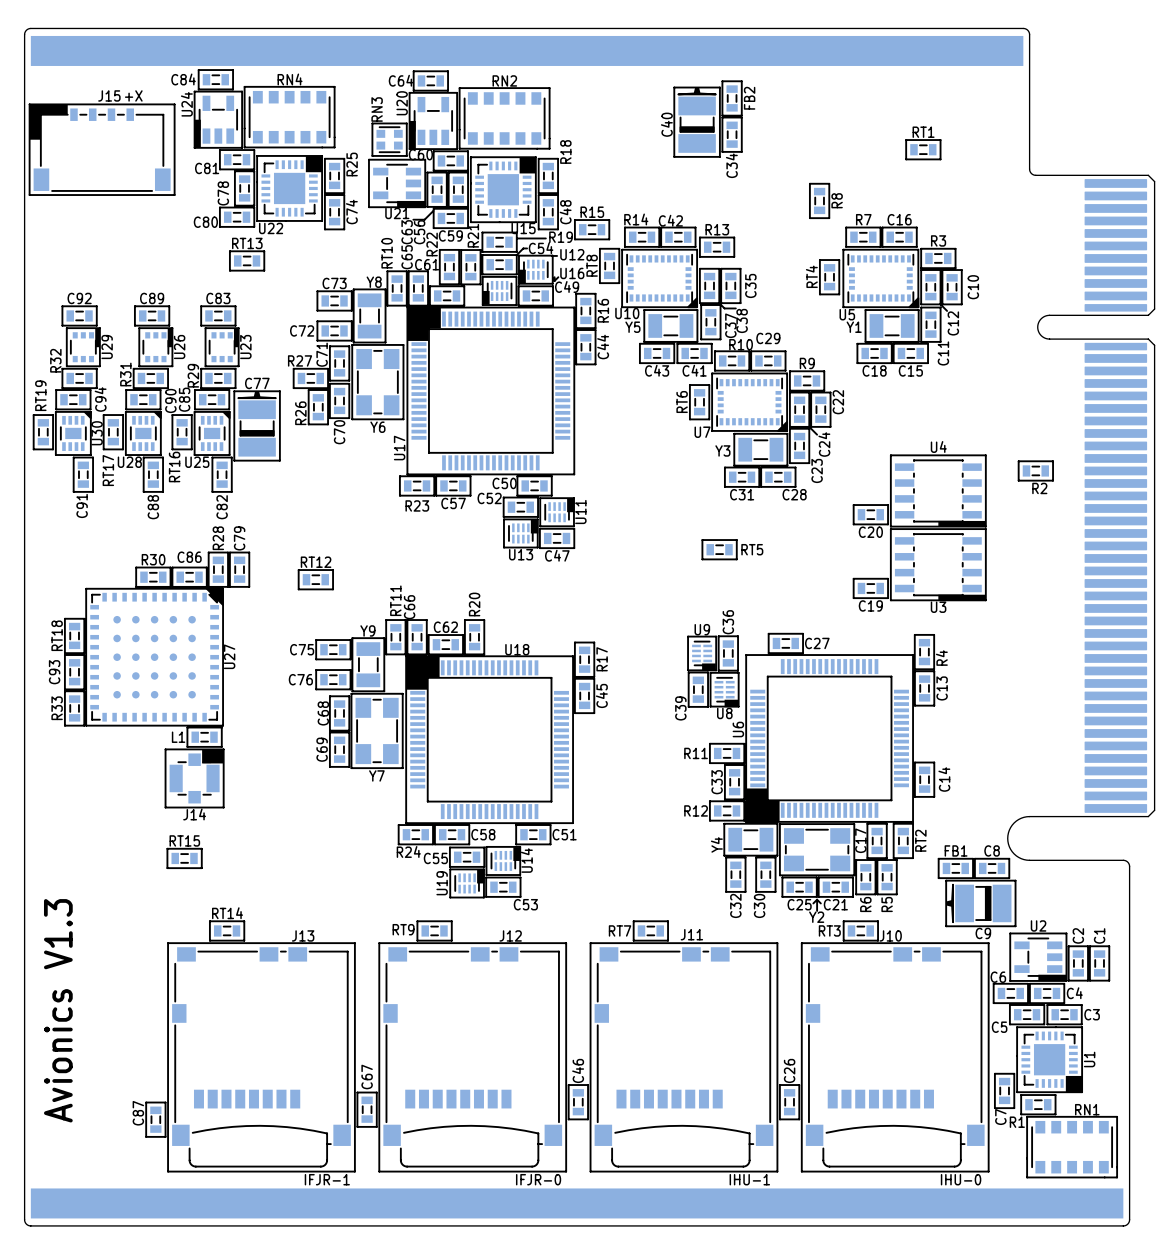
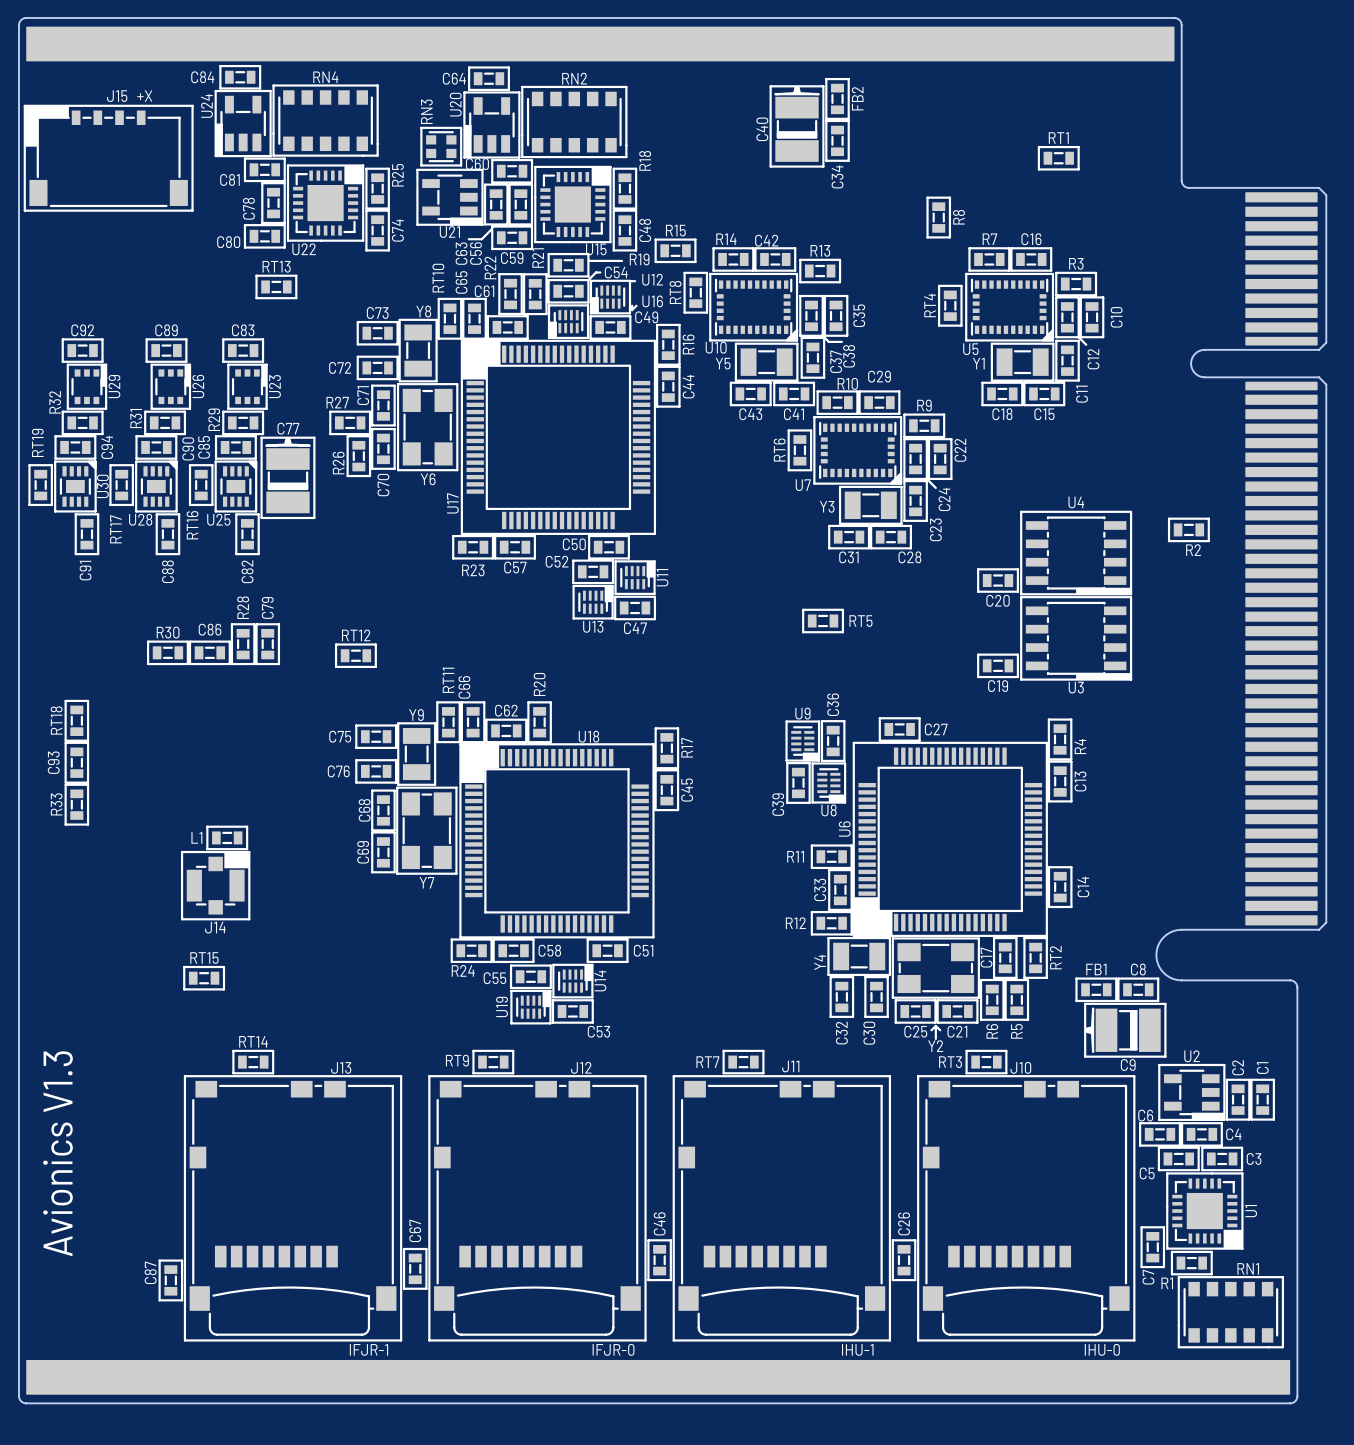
U27: (154, 657) -> none

